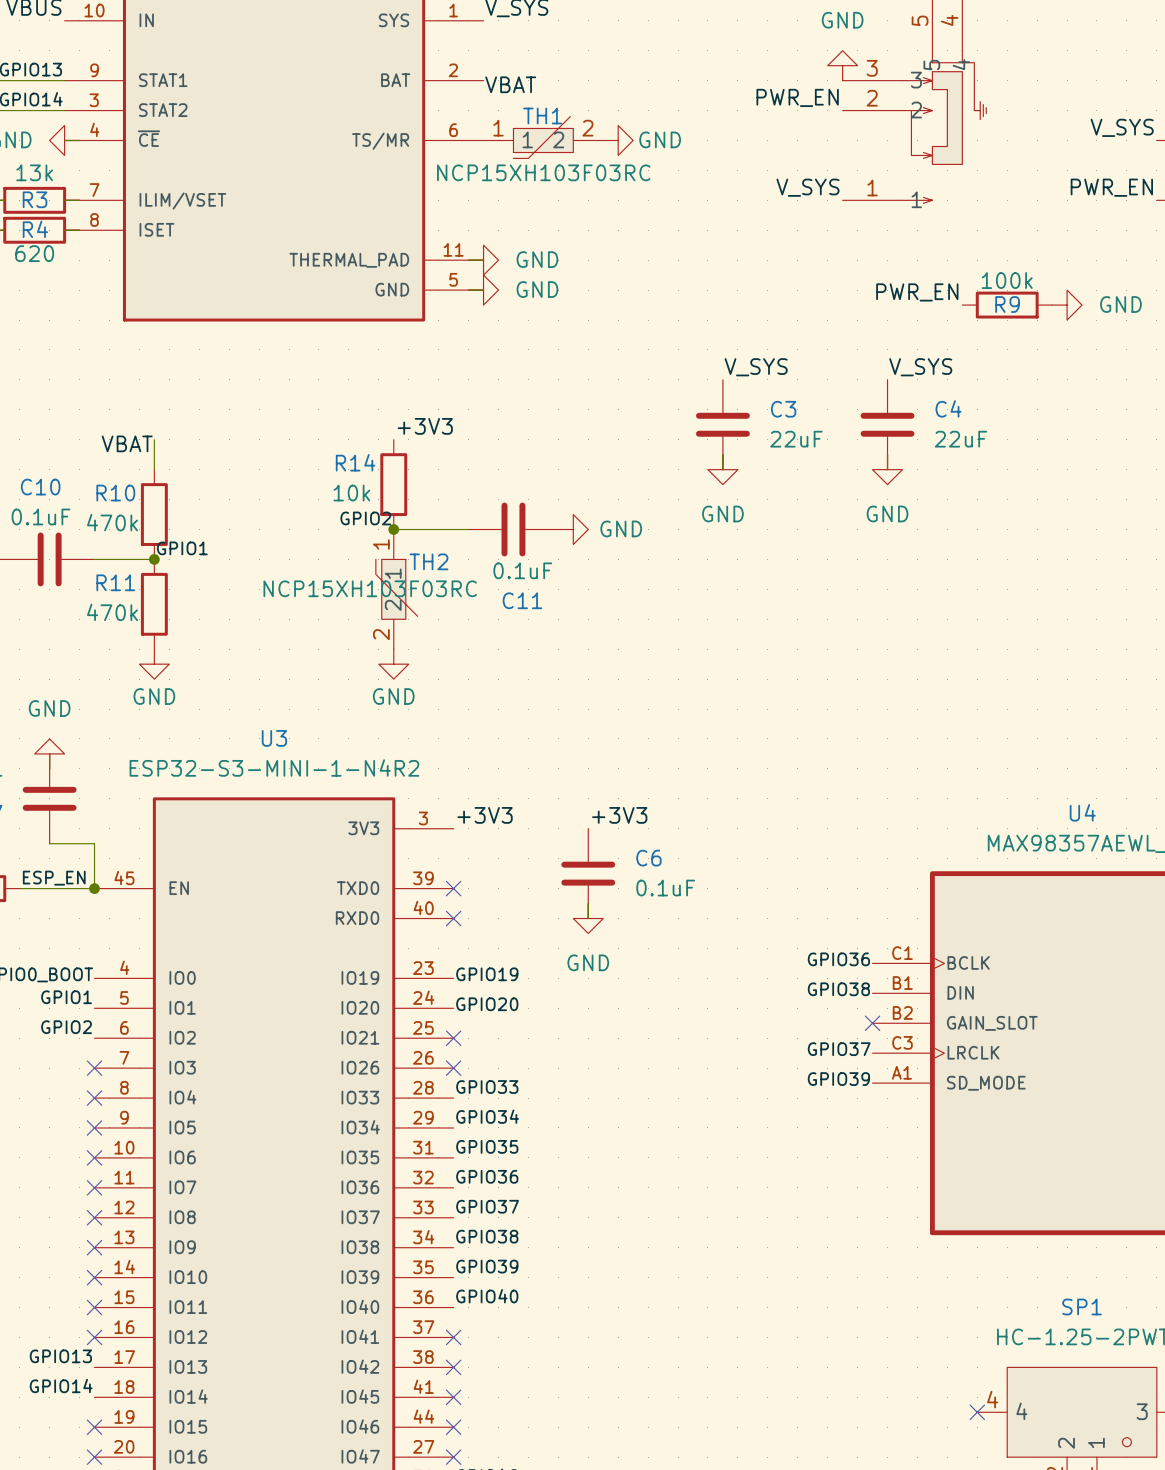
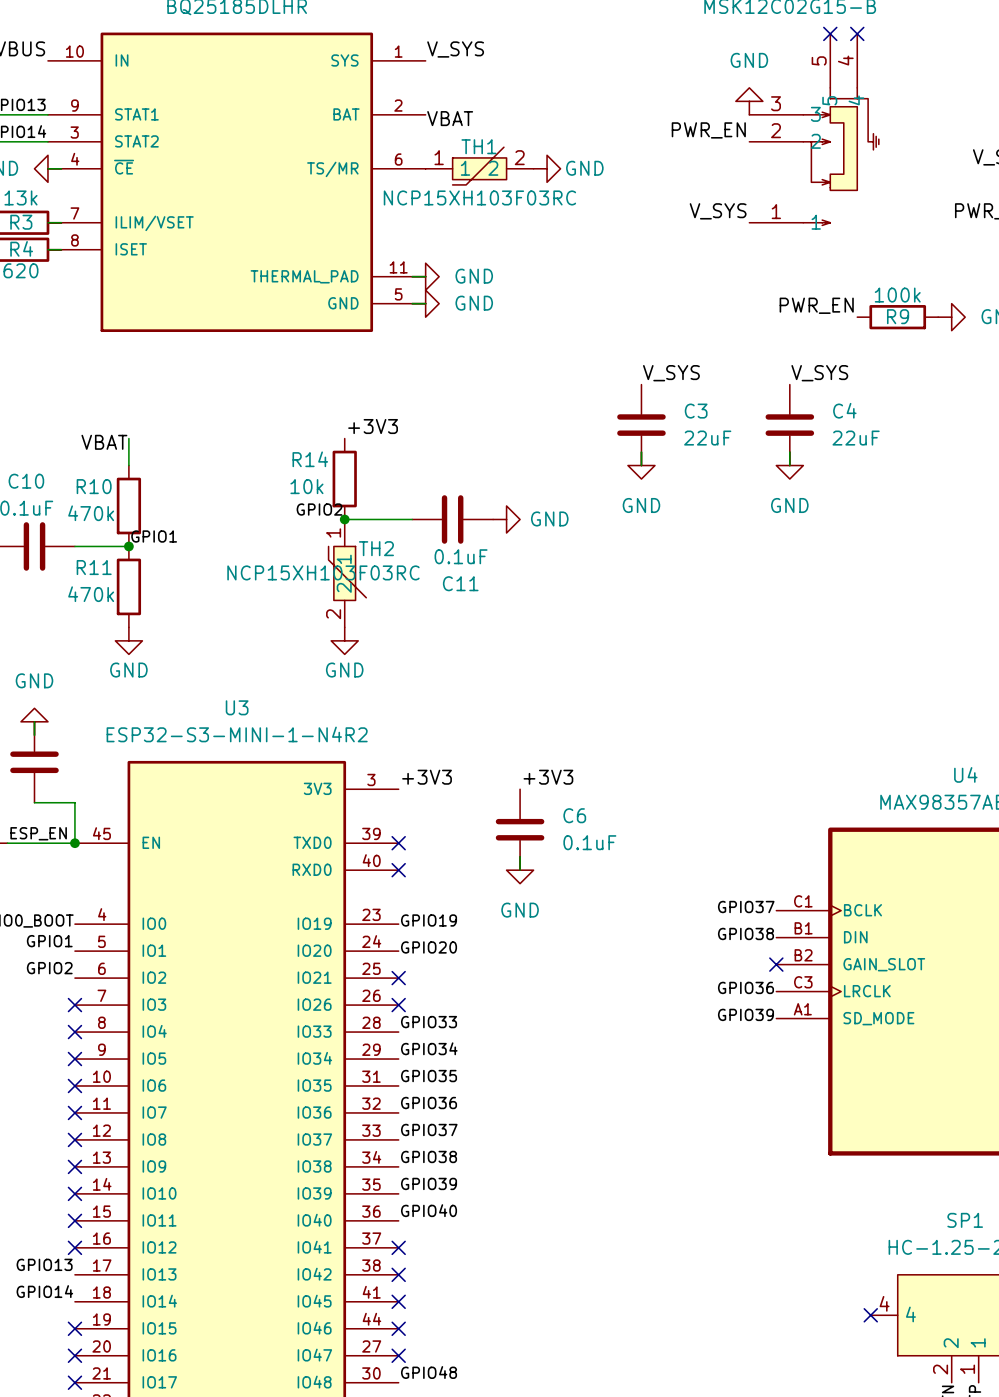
label: GPIO36 (838, 959) -> GPIO37 (746, 907)
label: GPIO37 (839, 1049) -> GPIO36 (745, 987)

